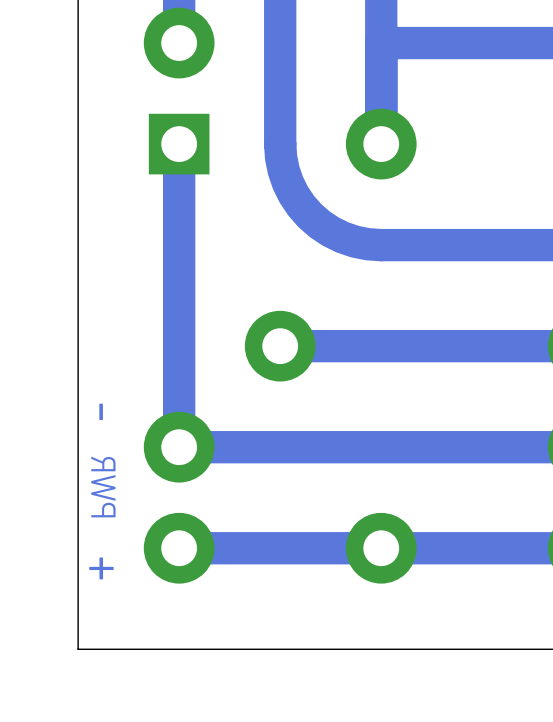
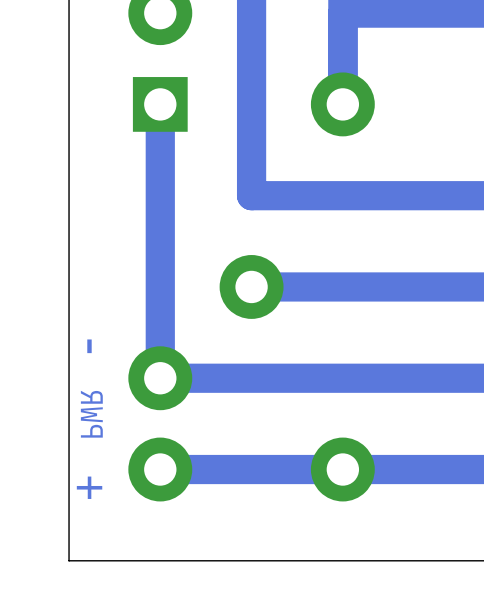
track: (280, 144) (281, 157) (287, 182) (293, 194) (309, 215) (330, 231) (342, 237) (355, 241) (381, 245) -> (251, 104) (251, 195) (342, 195)

